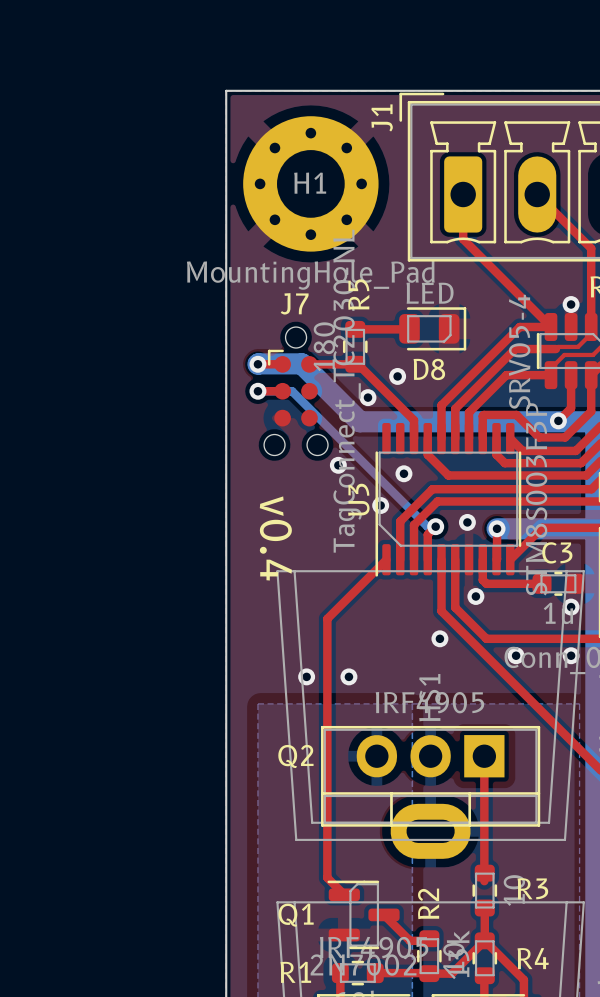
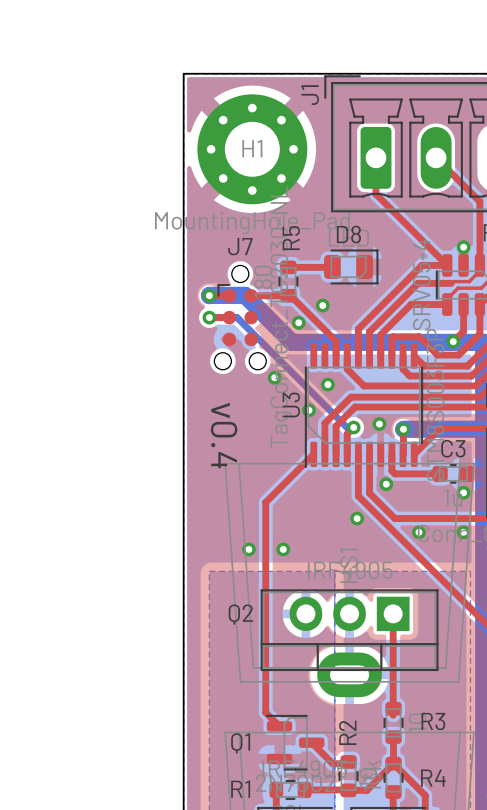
D8 name position: D8 (429, 369) -> D8 (348, 234)

